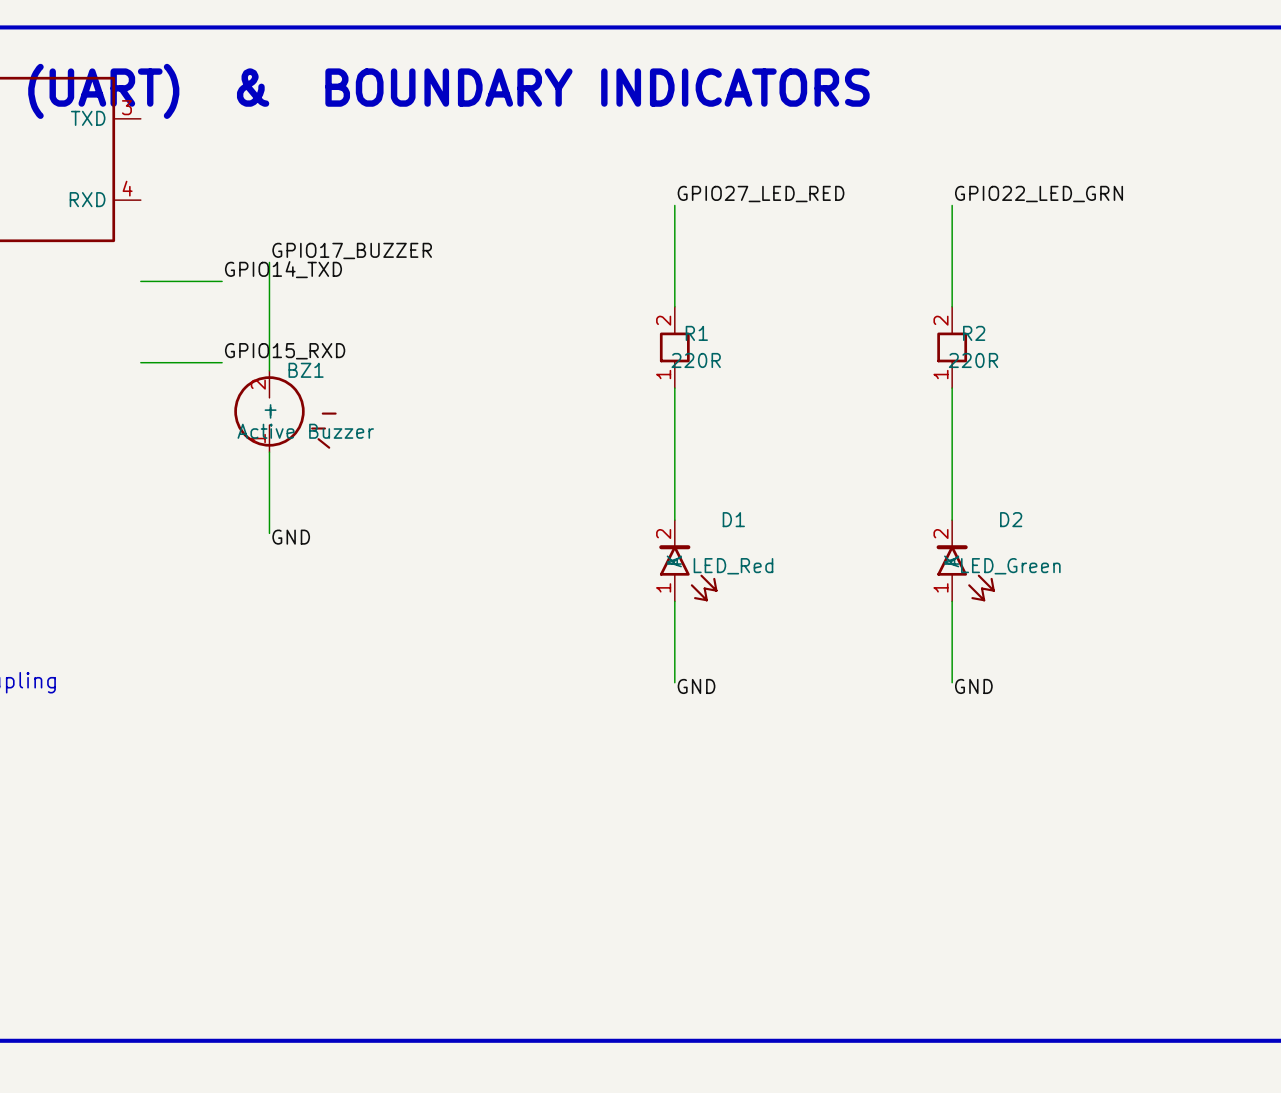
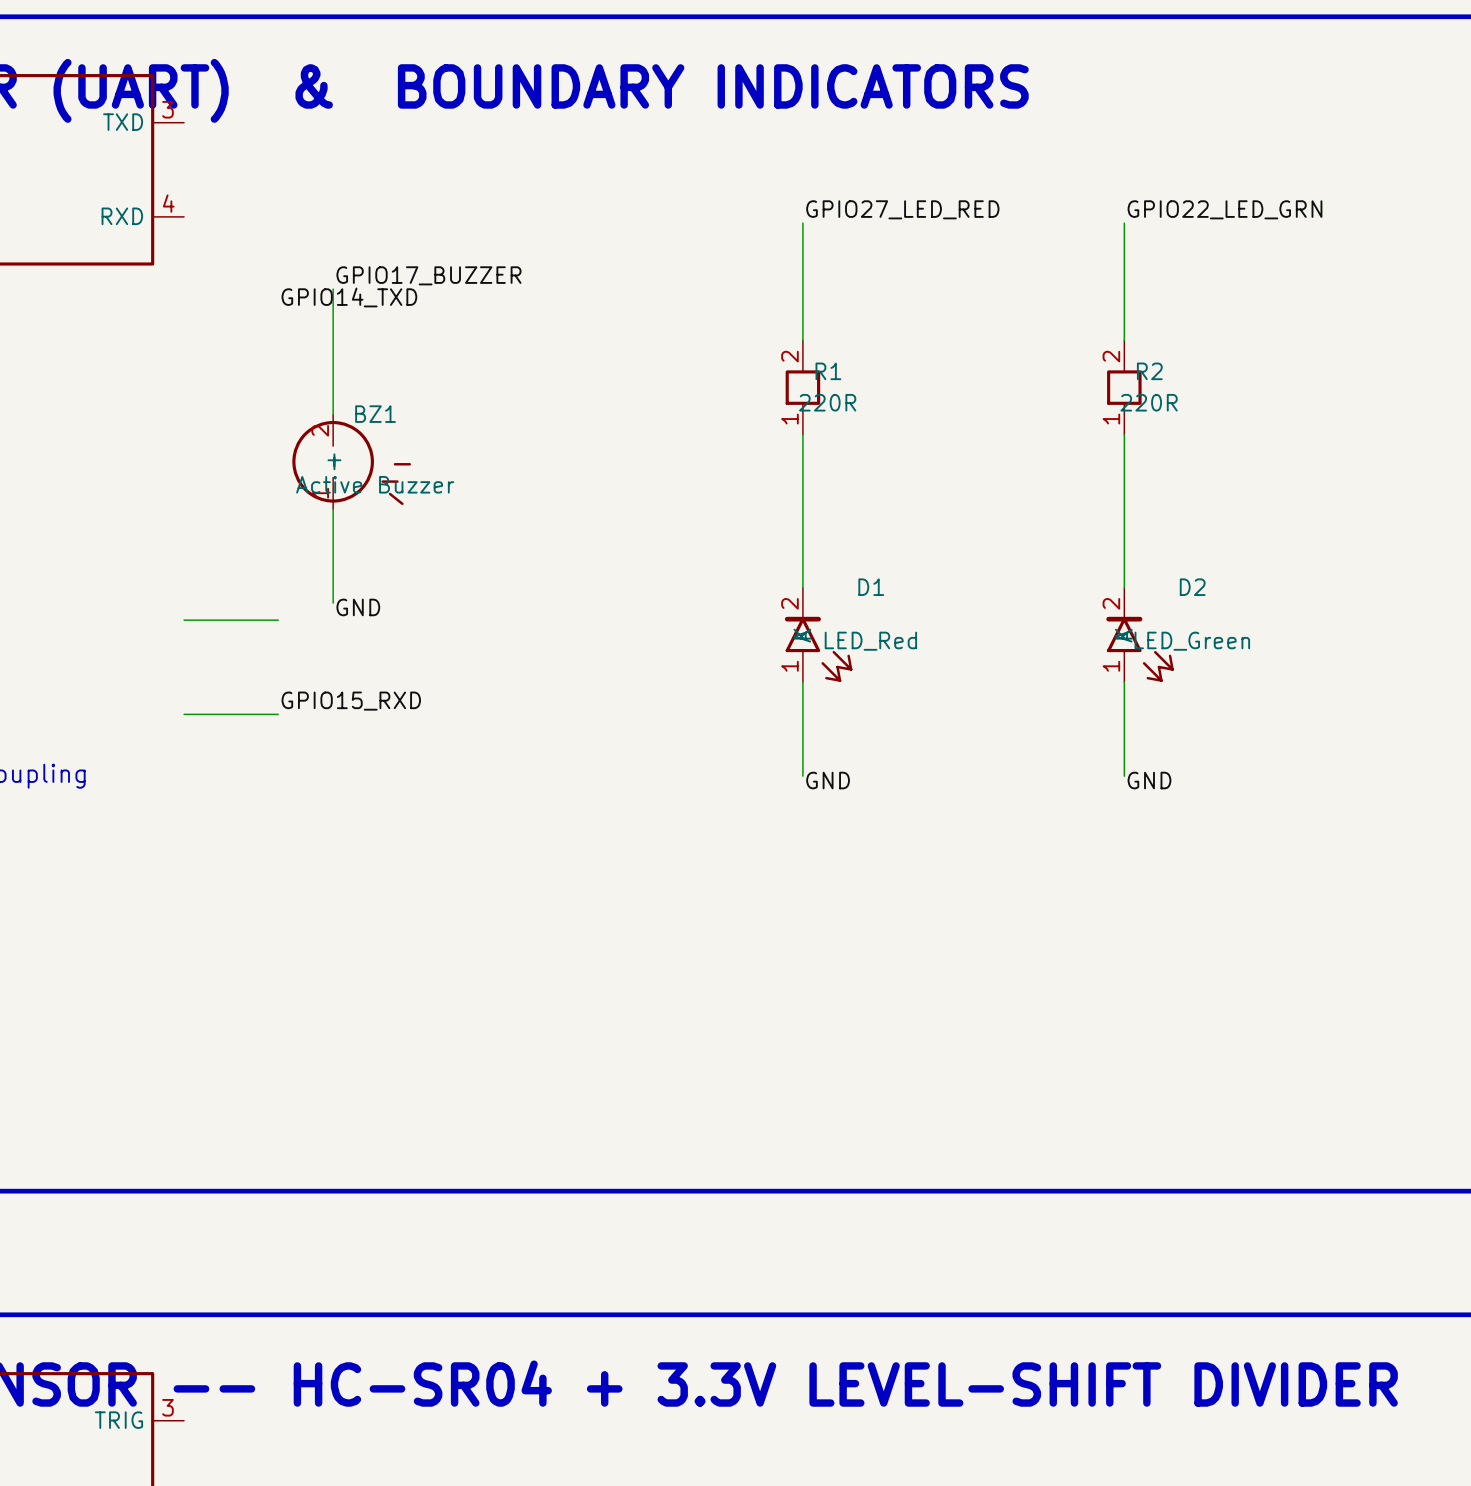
wire: (140, 281) (222, 281) -> none
label: GPIO15_RXD (285, 351) -> none
wire: (140, 362) (222, 362) -> (184, 620) (278, 620)
label: none -> GPIO15_RXD (351, 701)
wire: none -> (184, 714) (278, 714)

